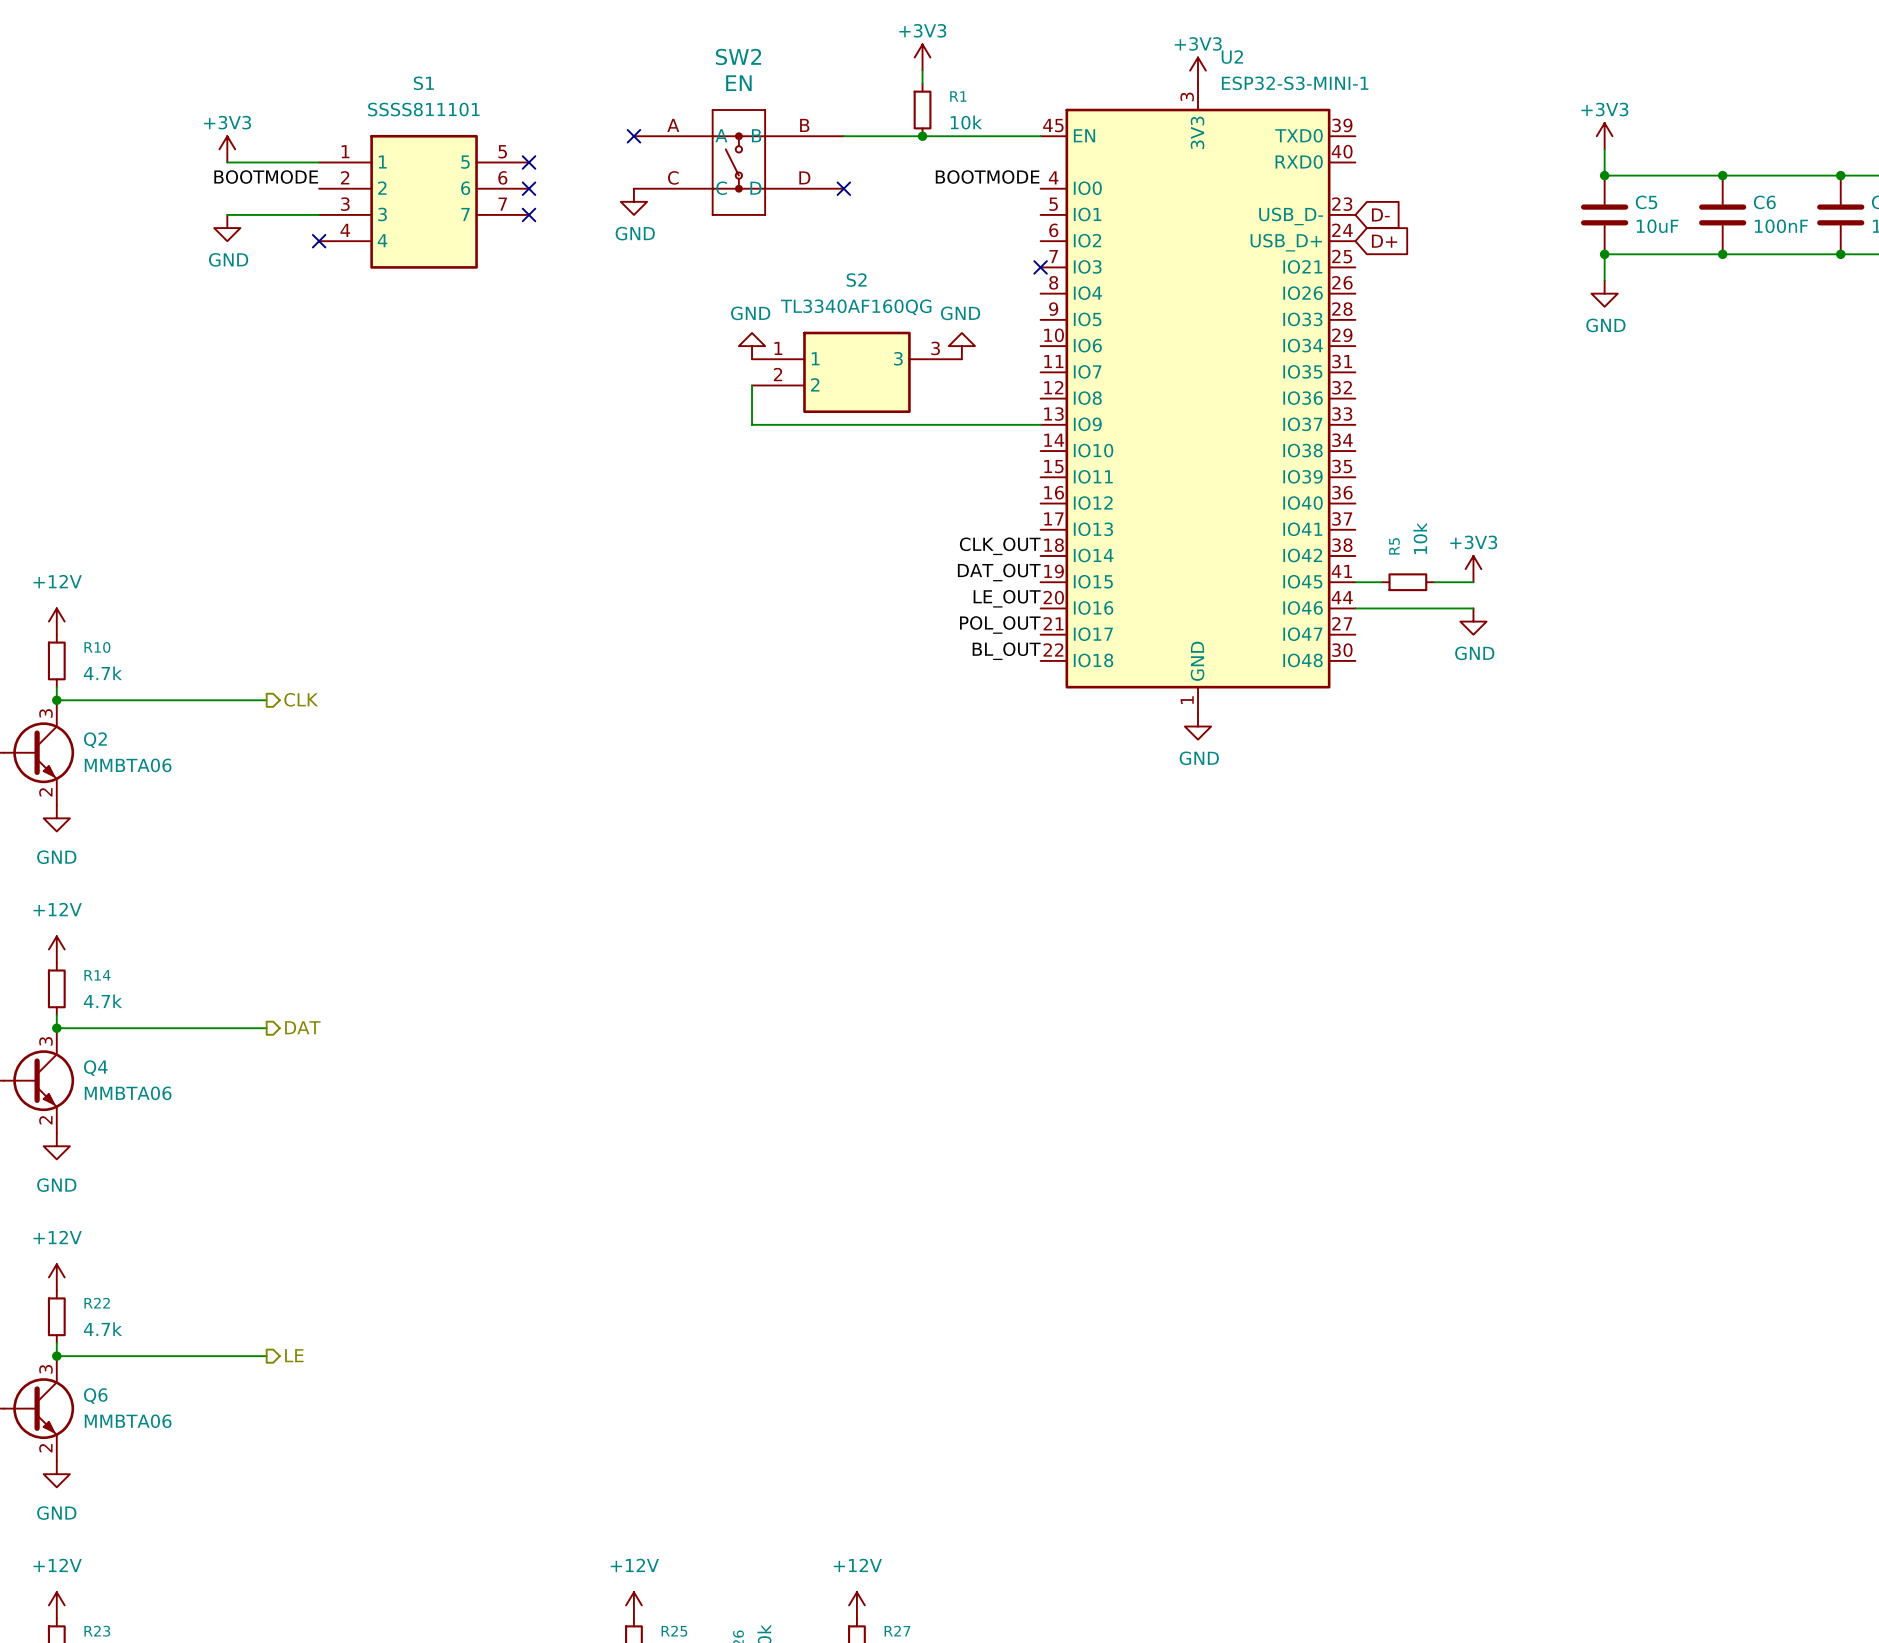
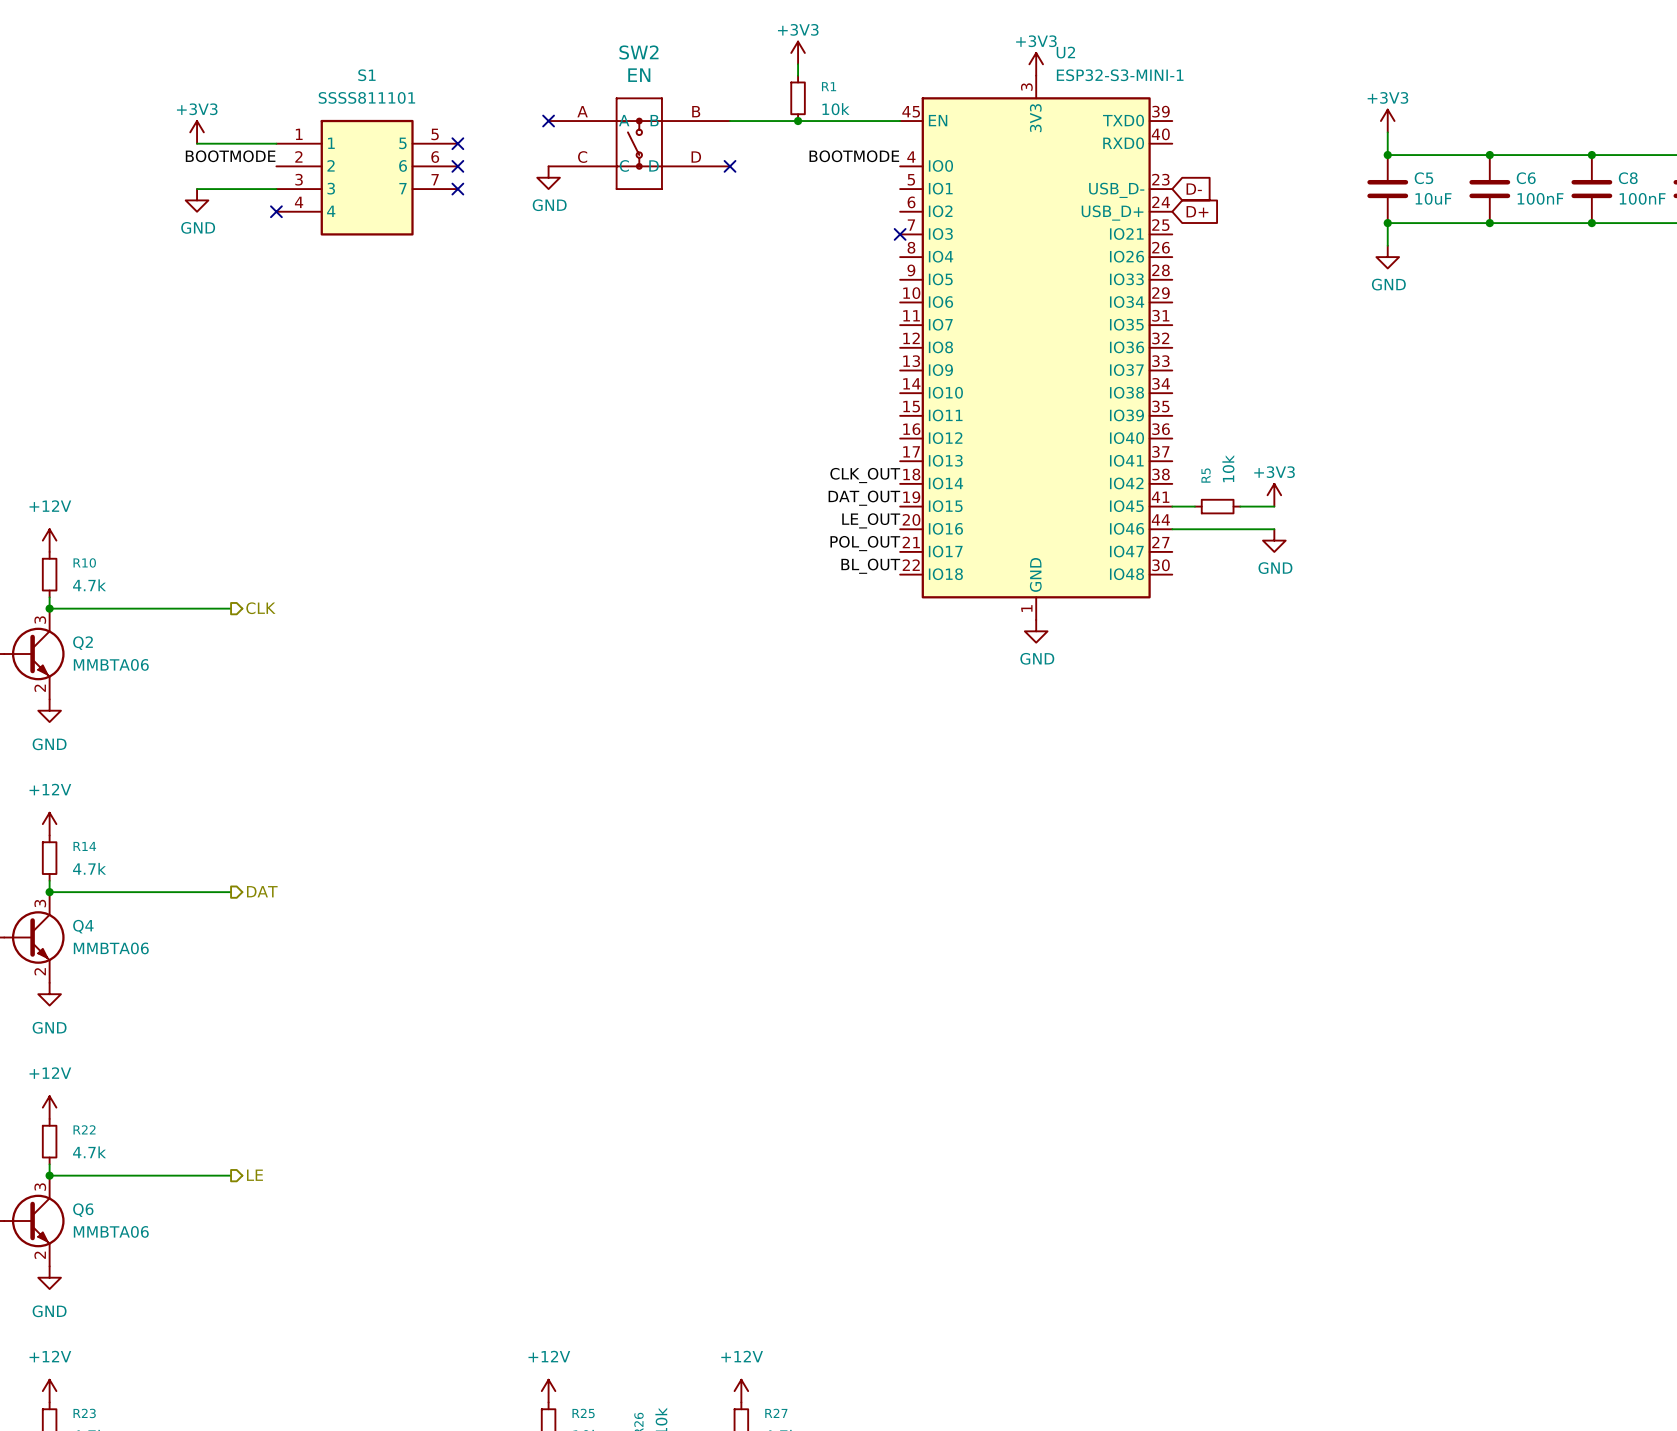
power symbol: GND (752, 346) -> none
power symbol: GND (961, 346) -> none
S2: TL3340AF160QG (856, 372) -> none
wire: (752, 385) (752, 424) (1040, 424) -> none

